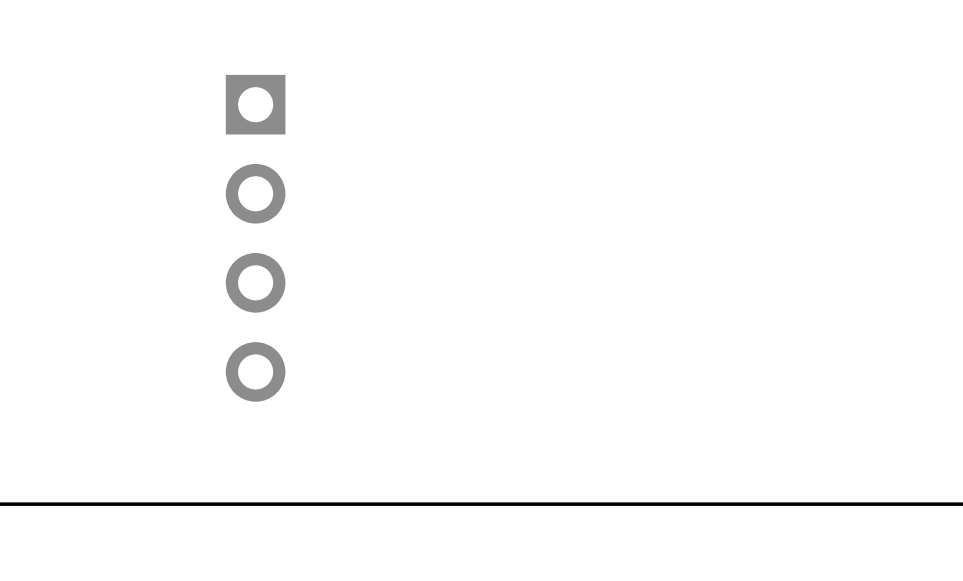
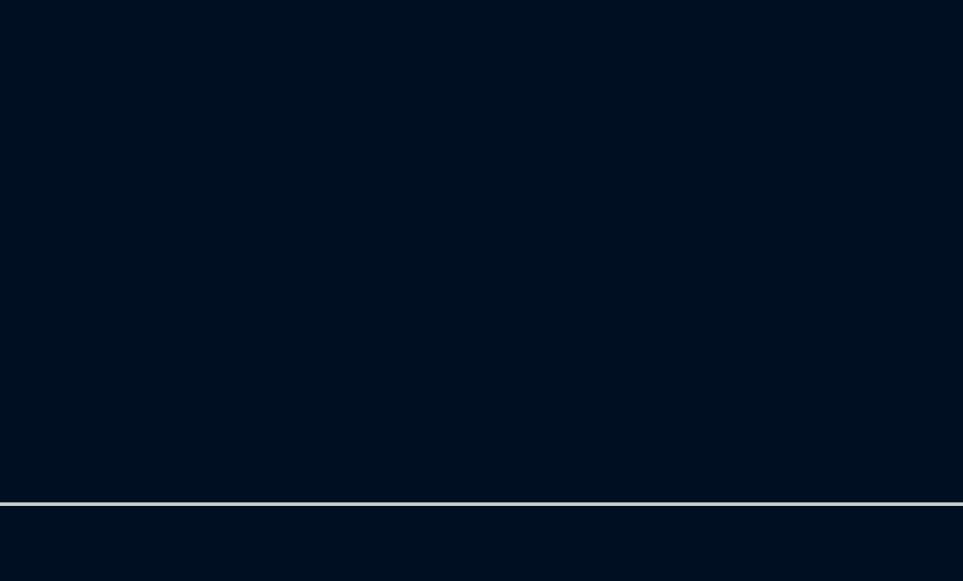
part: (255, 238) -> none

